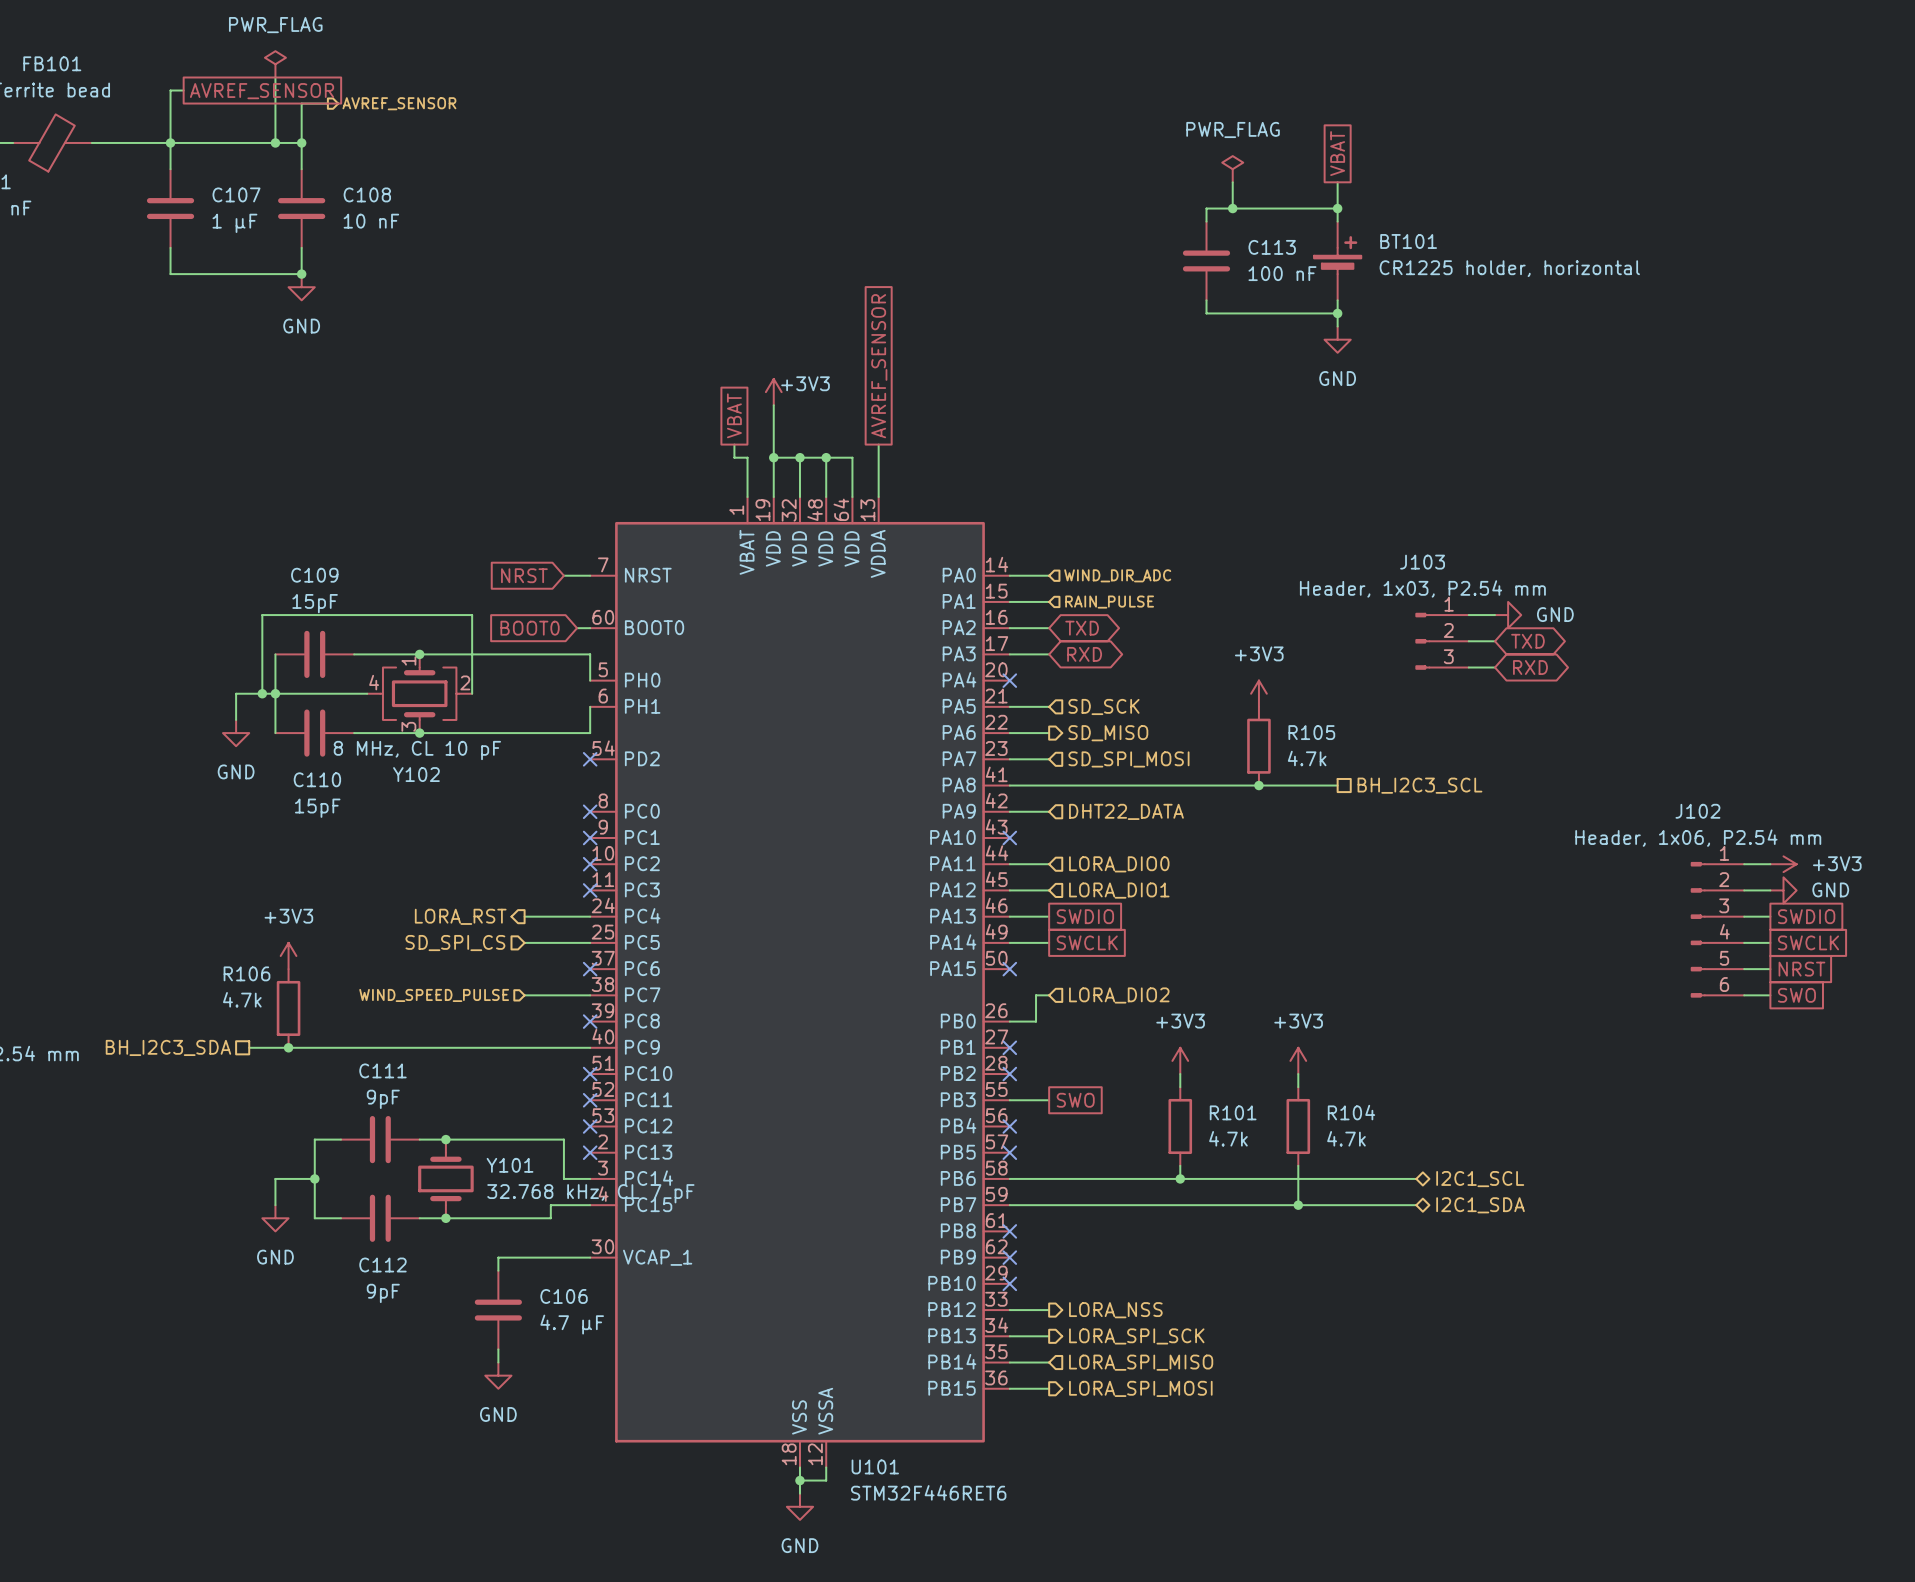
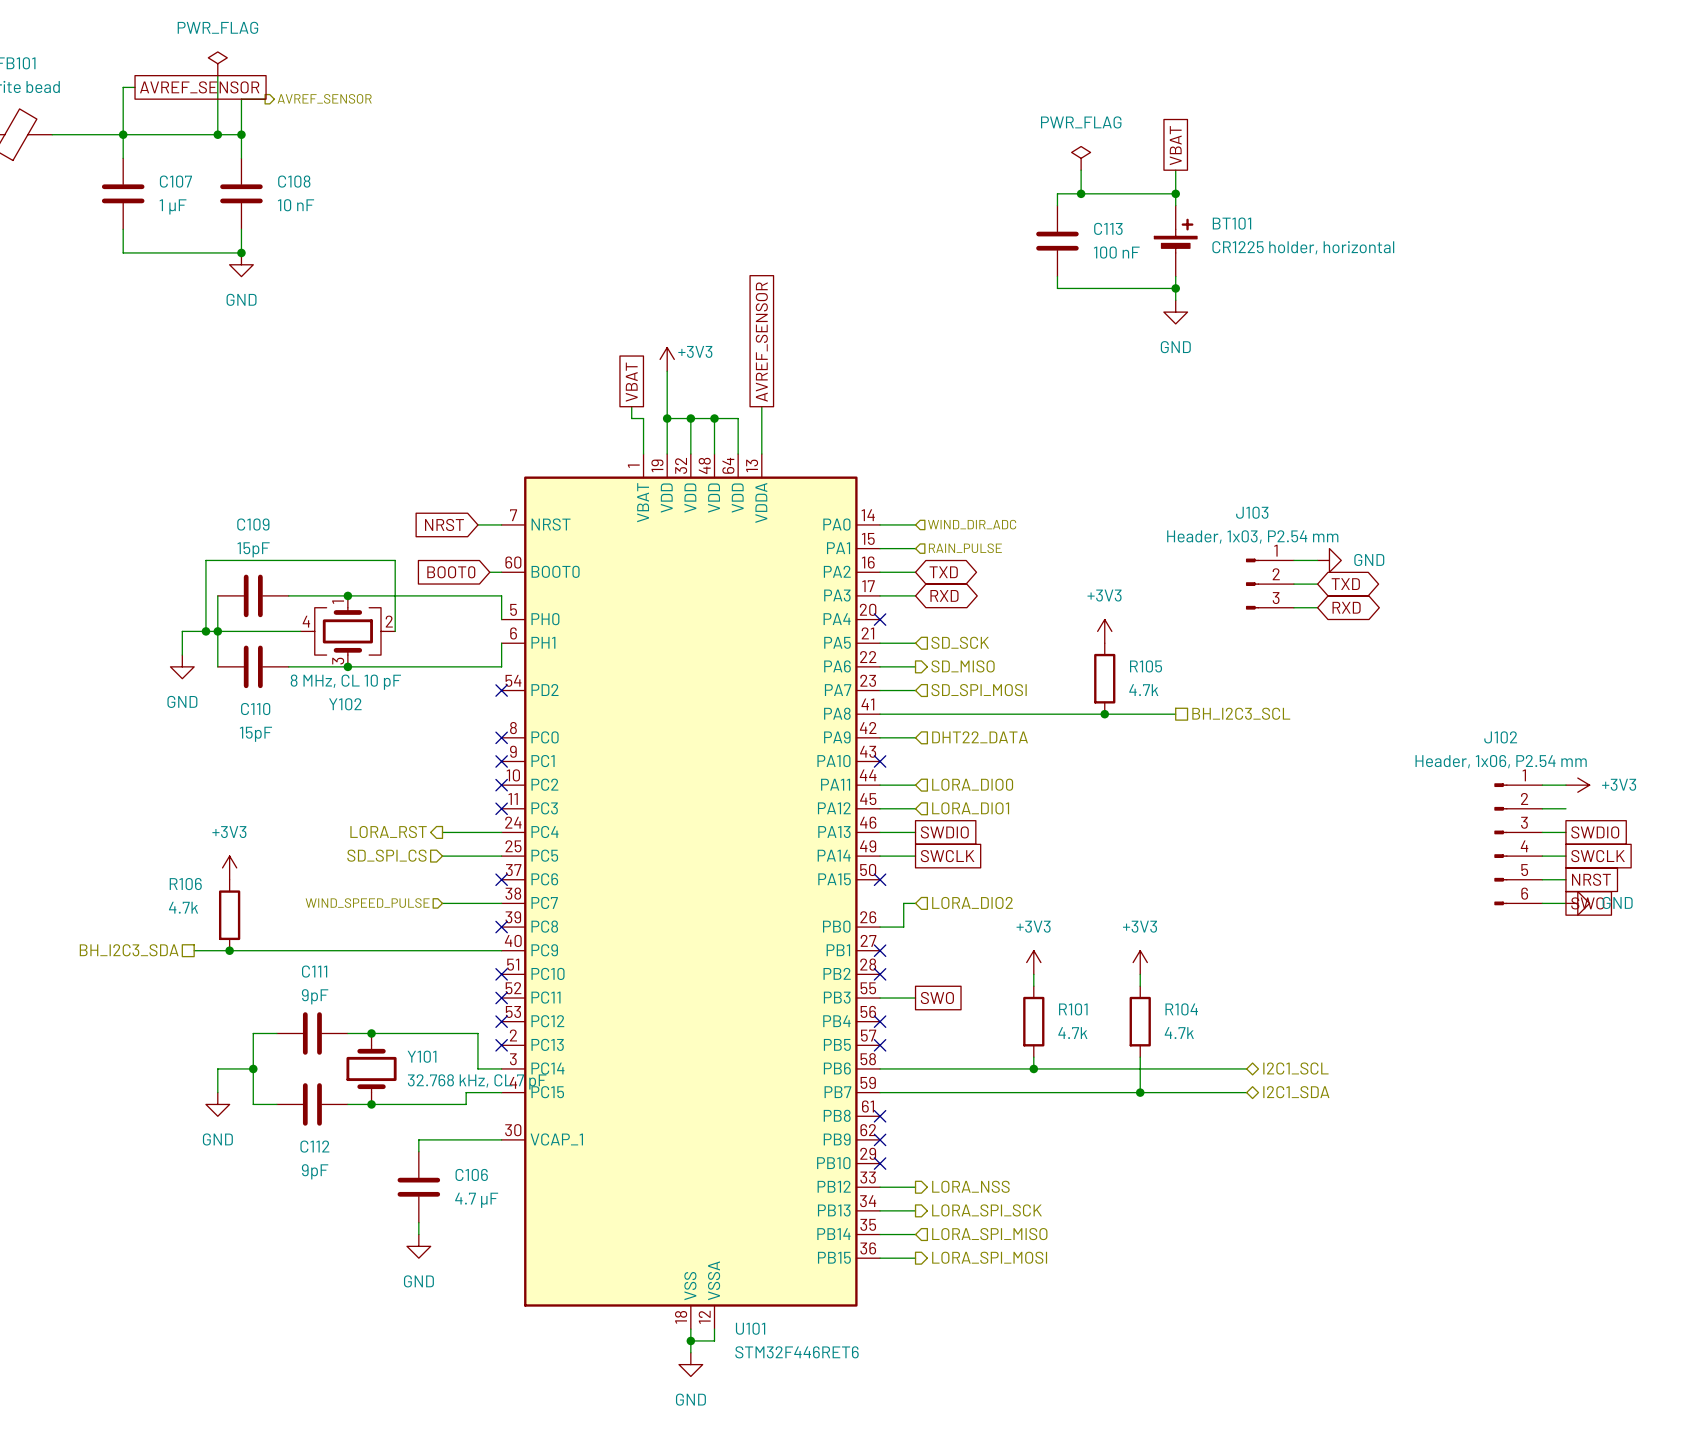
power symbol position: GND (1783, 890) -> GND (1577, 903)

